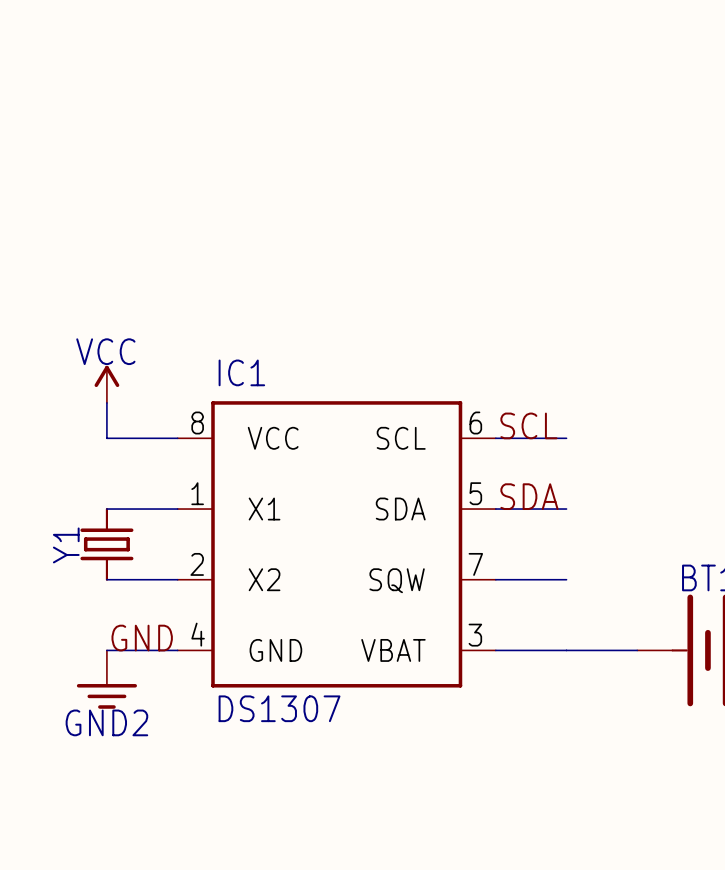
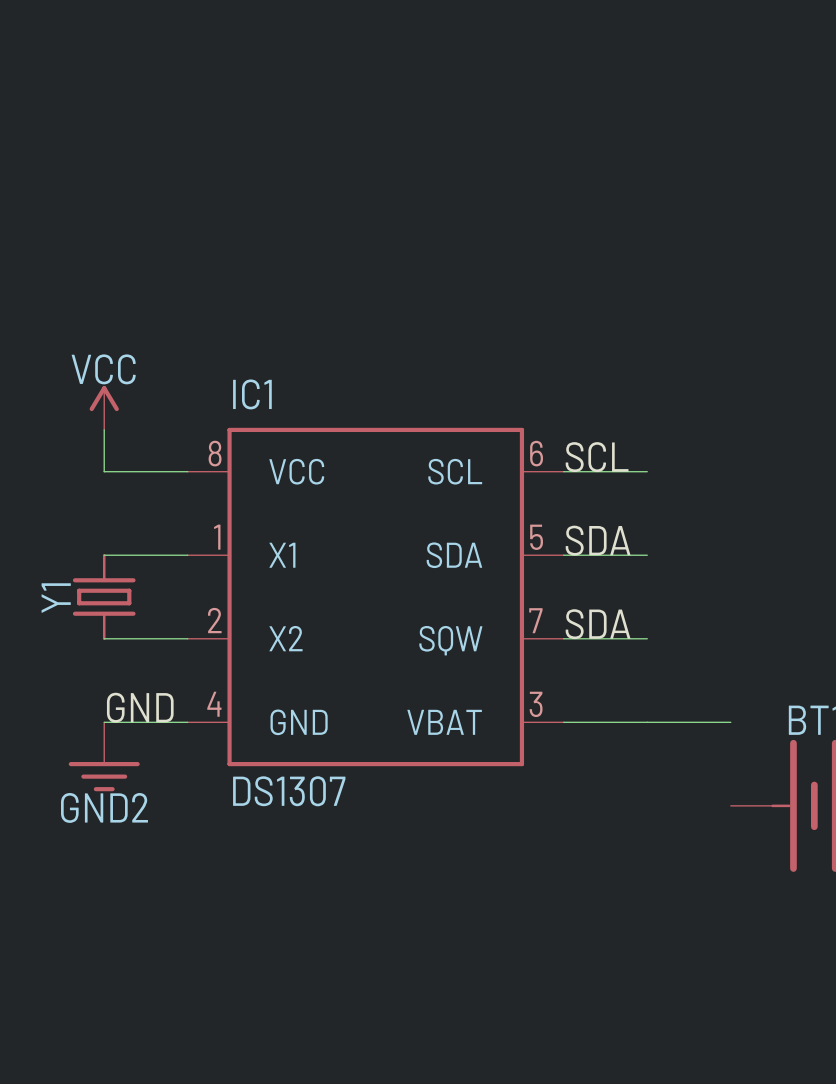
wire: none -> (104, 429) (104, 471) (187, 471)
label: none -> SCL (597, 457)
wire: none -> (563, 471) (647, 471)
power symbol position: VCC (106, 384) -> VCC (104, 407)
wire: (106, 402) (106, 438) -> none
label: SCL (528, 425) -> SDA (598, 540)
Y1 position: (106, 544) -> (104, 597)
IC1 position: (336, 544) -> (375, 597)
wire: none -> (647, 722) (730, 722)
label position: GND (142, 638) -> GND (140, 707)
wire: (106, 650) (177, 650) -> none
wire: (495, 650) (637, 650) -> none
power symbol position: GND2 (106, 679) -> GND2 (104, 756)

